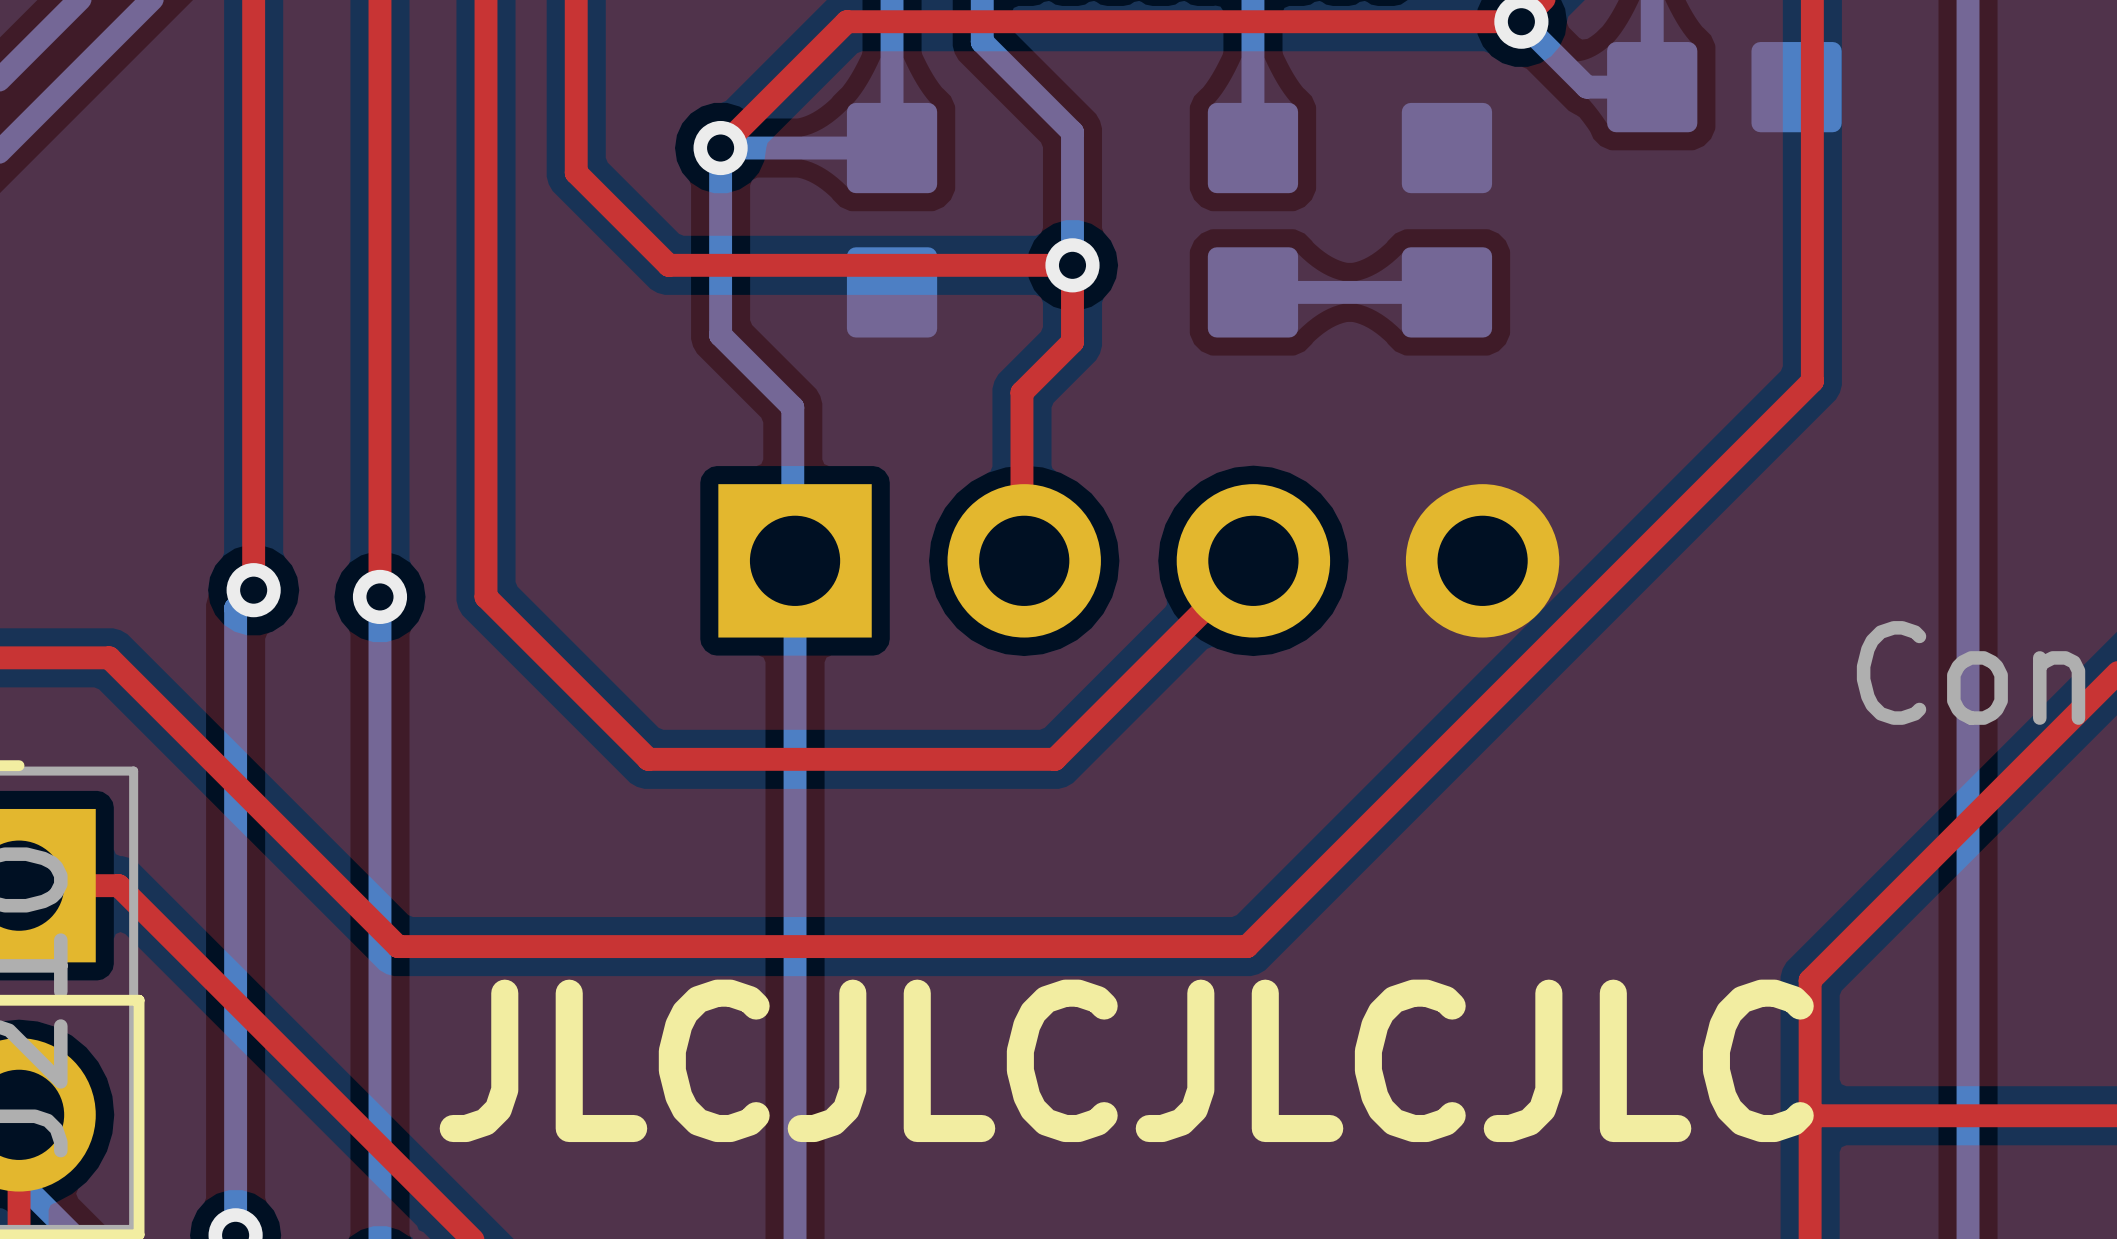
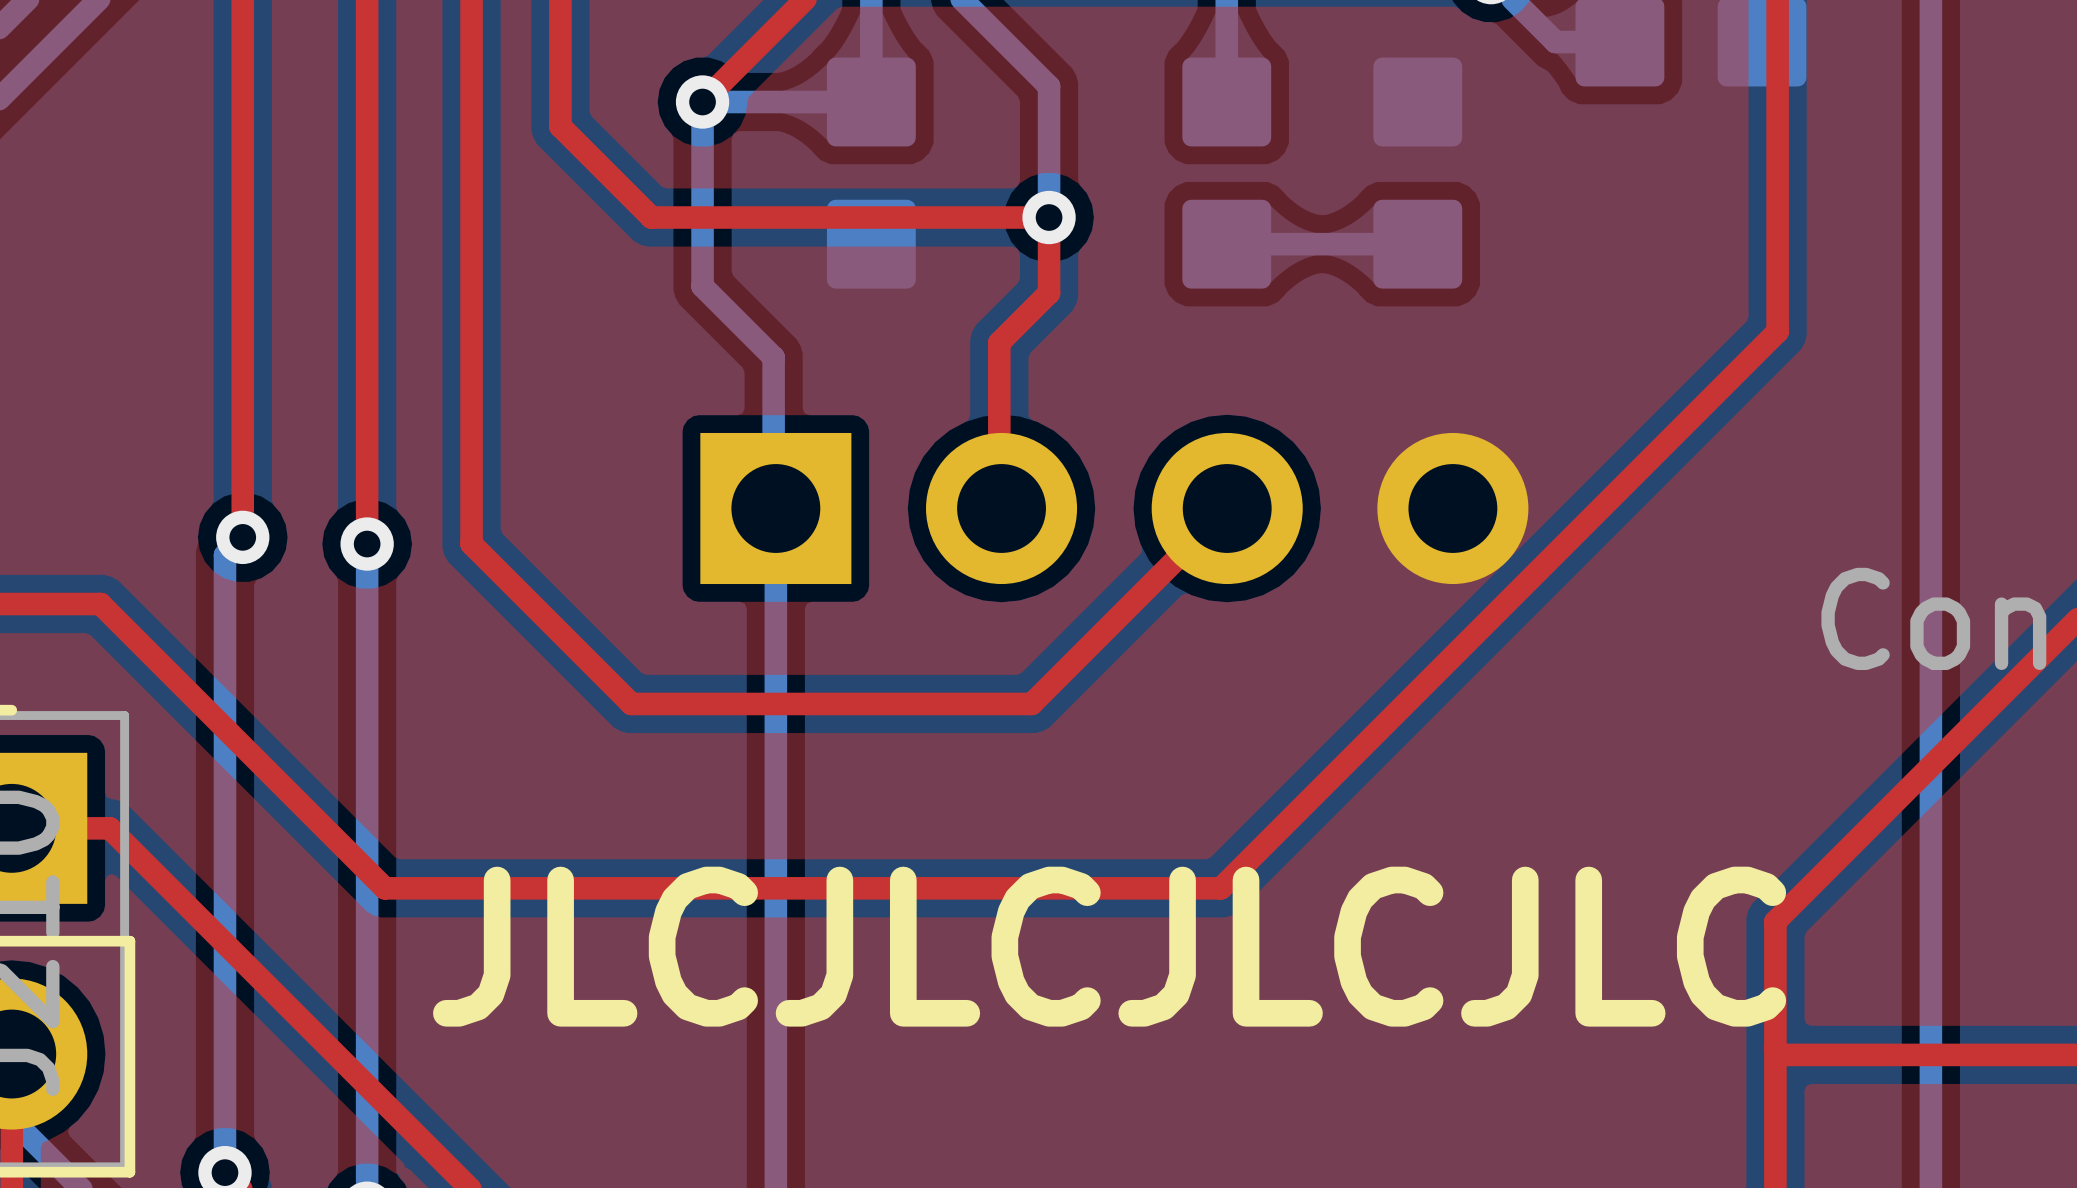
text position: JLCJLCJLCJLC (1126, 1060) -> JLCJLCJLCJLC (1109, 946)

